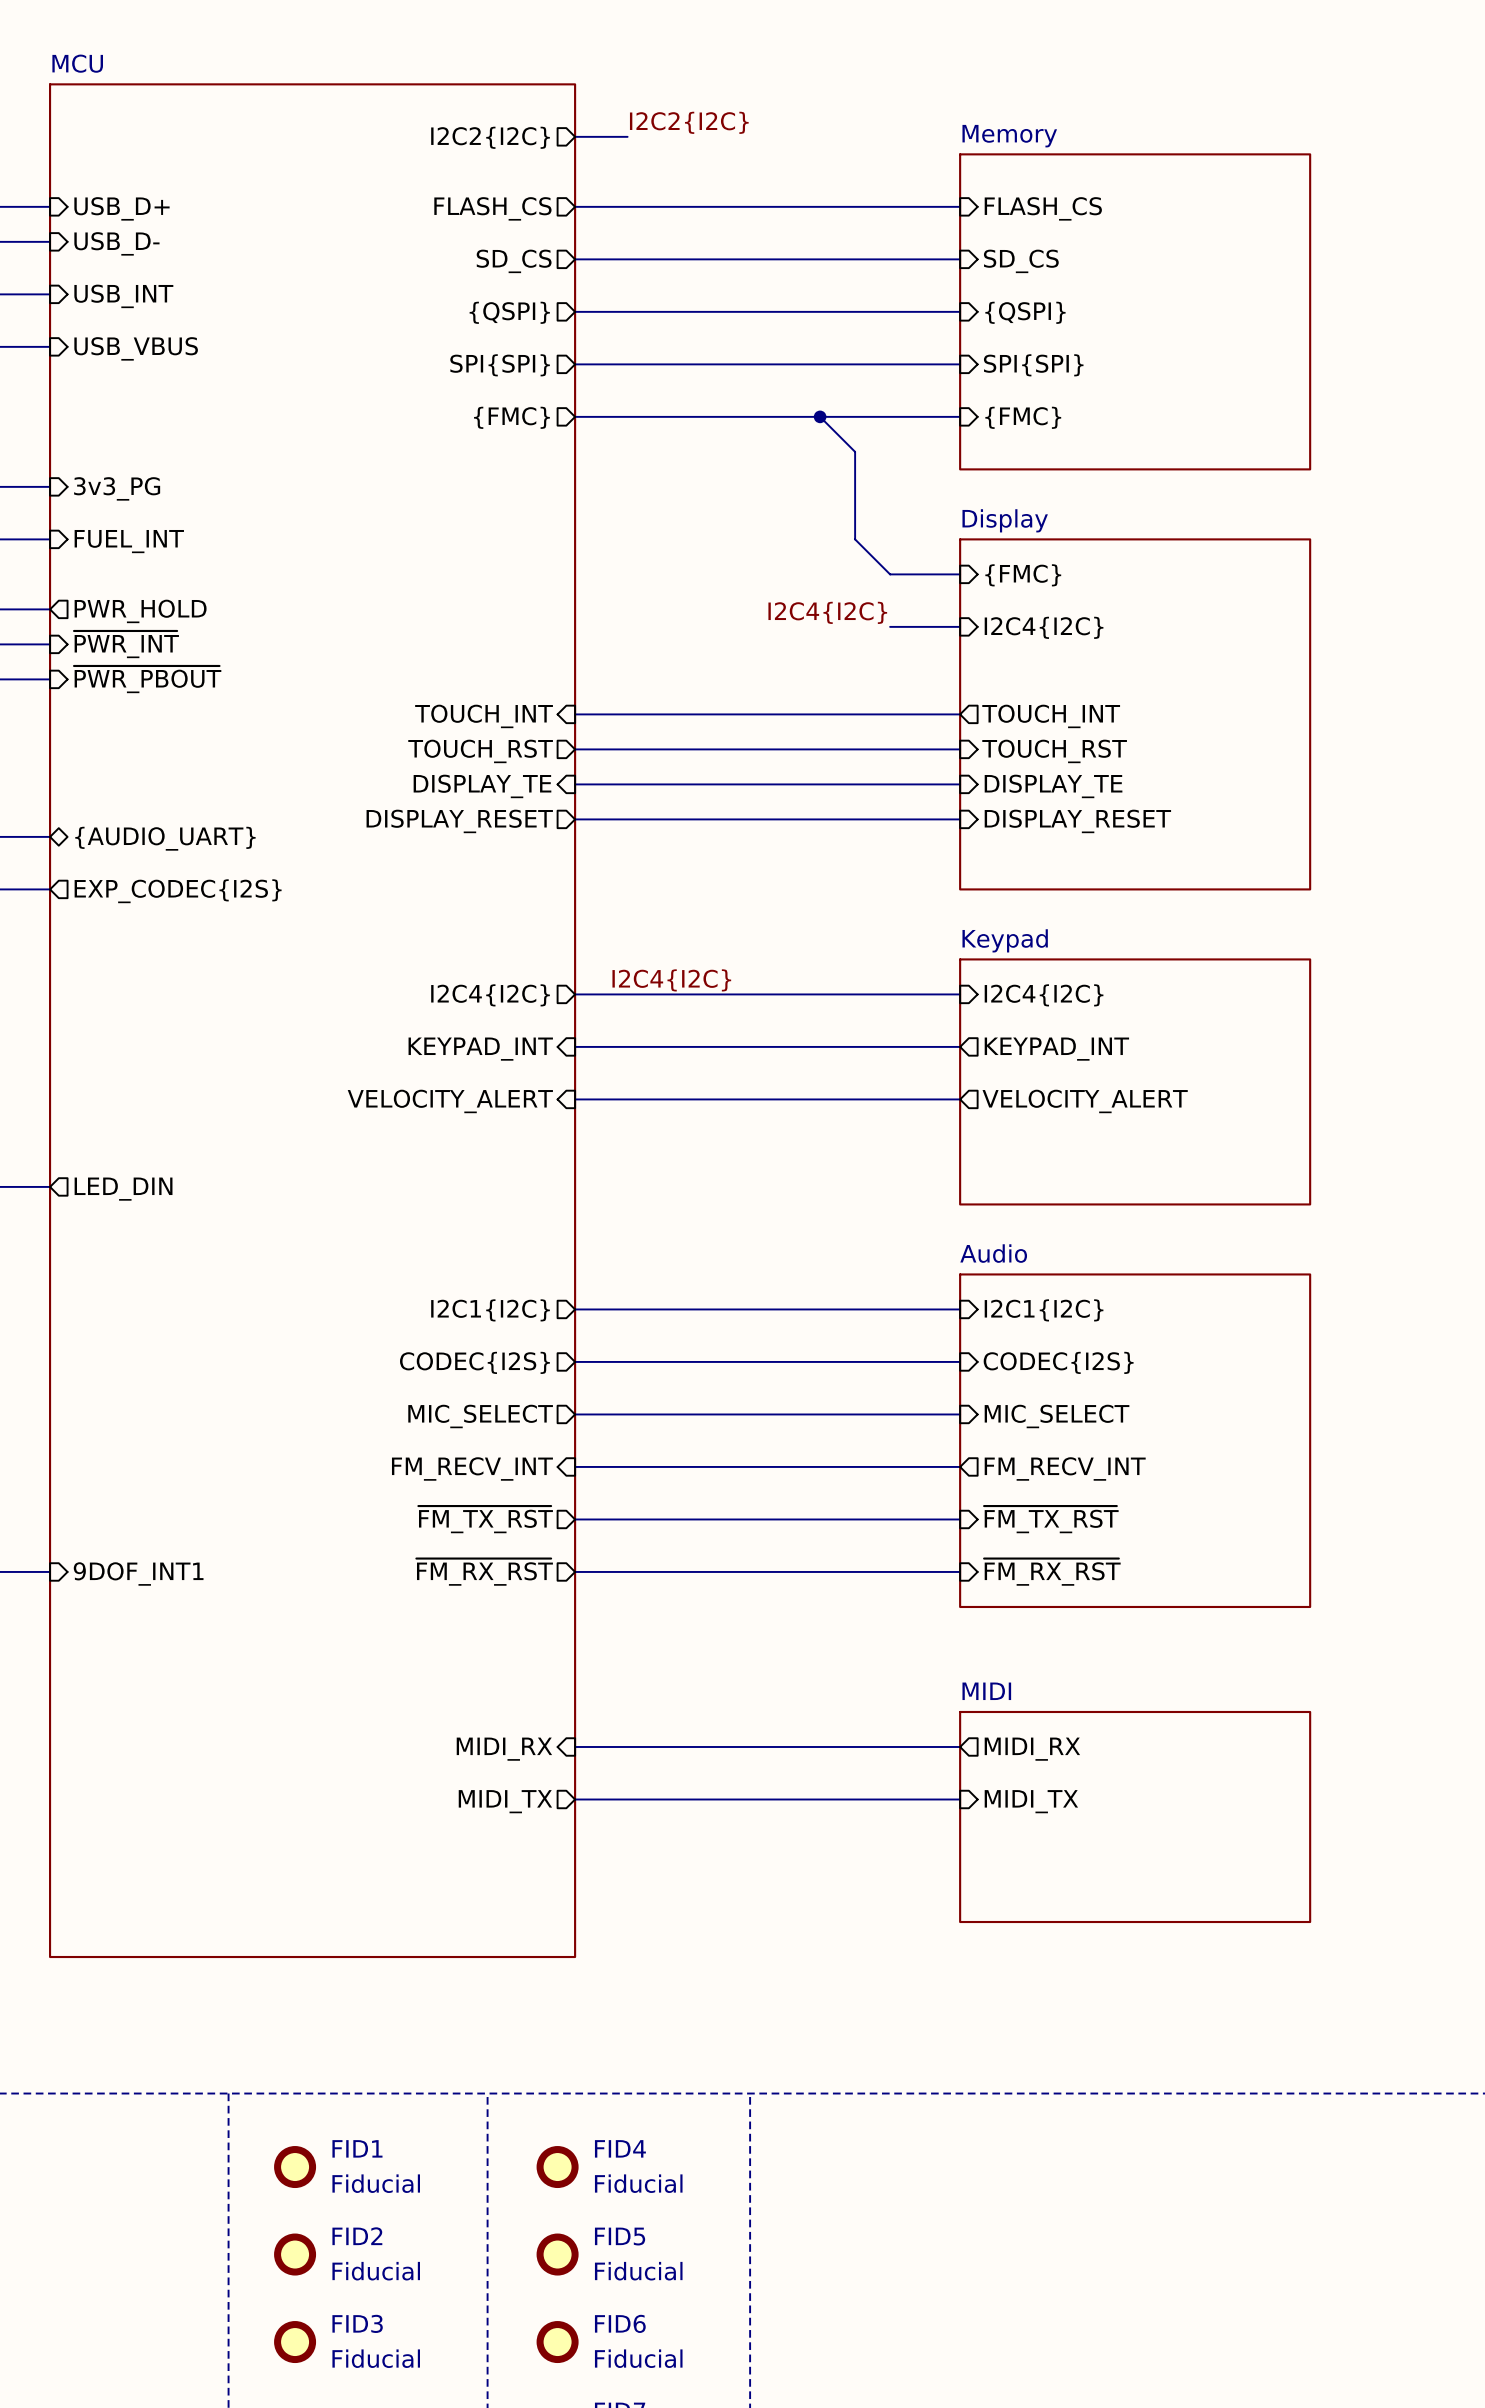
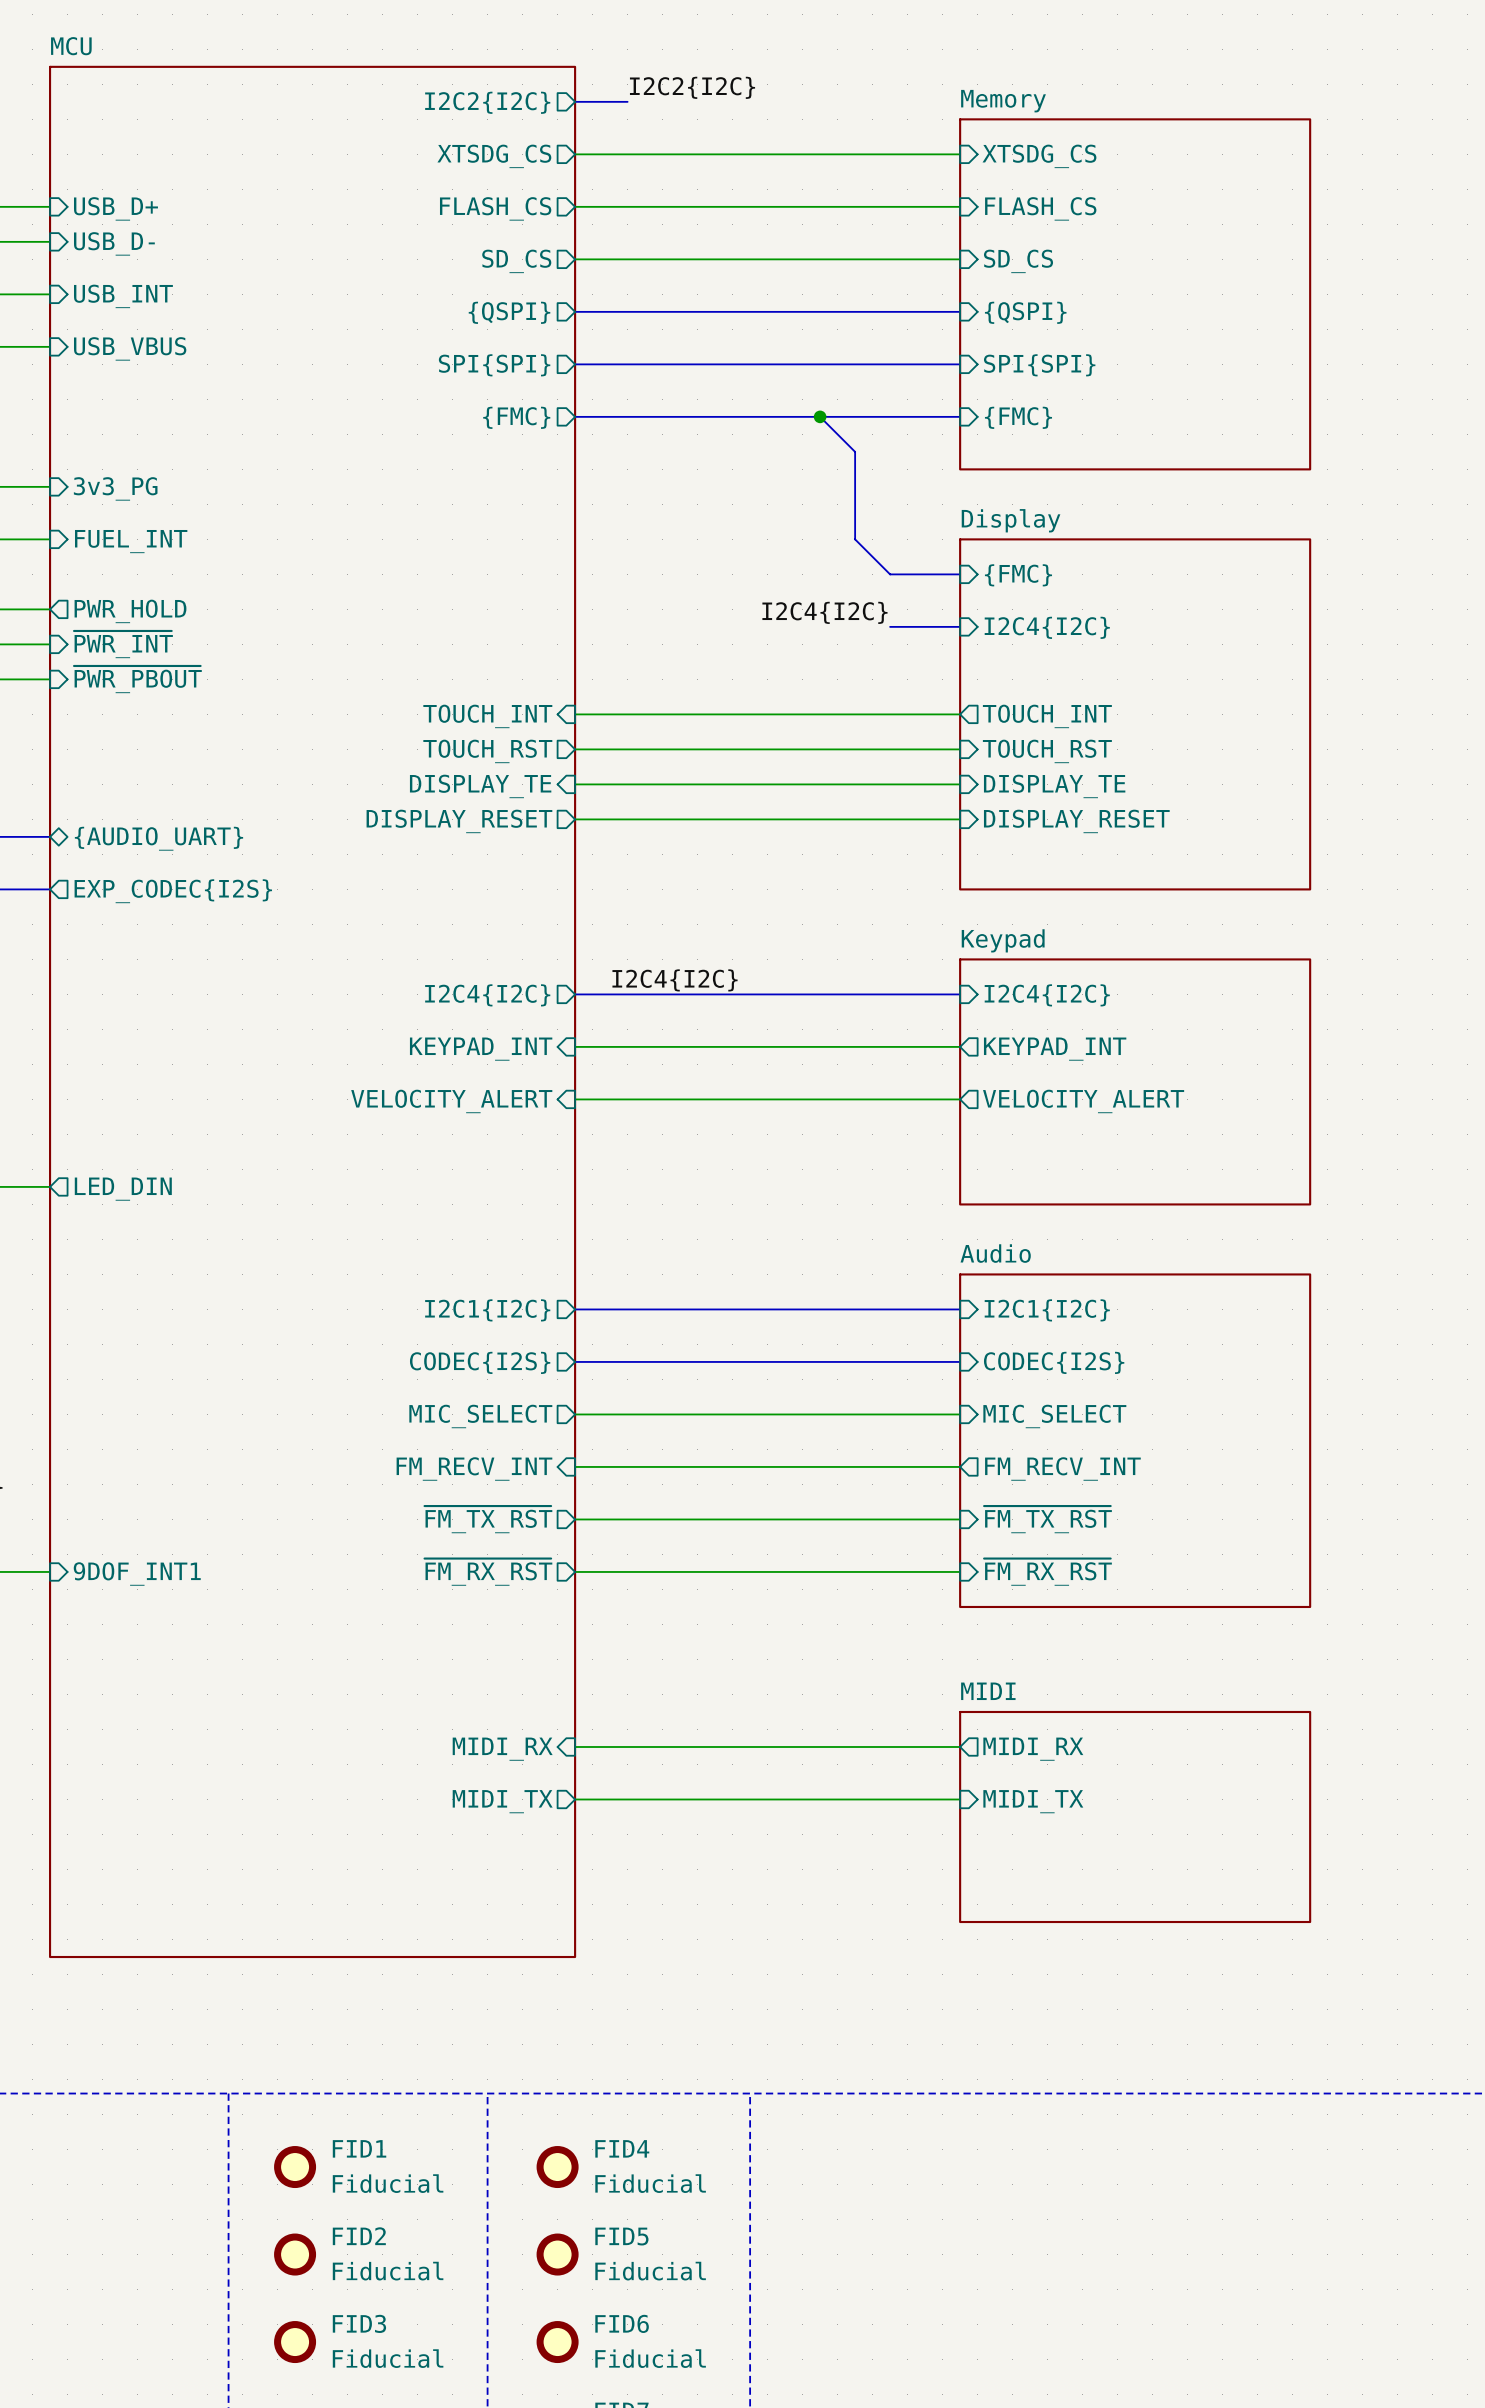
sheet MCU shape: [48, 83, 577, 1959] -> [48, 65, 577, 1959]
label position: I2C2{I2C} (689, 122) -> I2C2{I2C} (692, 87)
bus: (575, 136) (627, 136) -> (575, 101) (627, 101)
sheet pin position: I2C2{I2C} (490, 137) -> I2C2{I2C} (487, 102)
wire: none -> (575, 154) (960, 154)
sheet pin: none -> XTSDG_CS (494, 156)
sheet pin: none -> XTSDG_CS (1039, 156)
sheet Memory: none -> (1135, 294)
sheet Memory: (1135, 311) -> none

